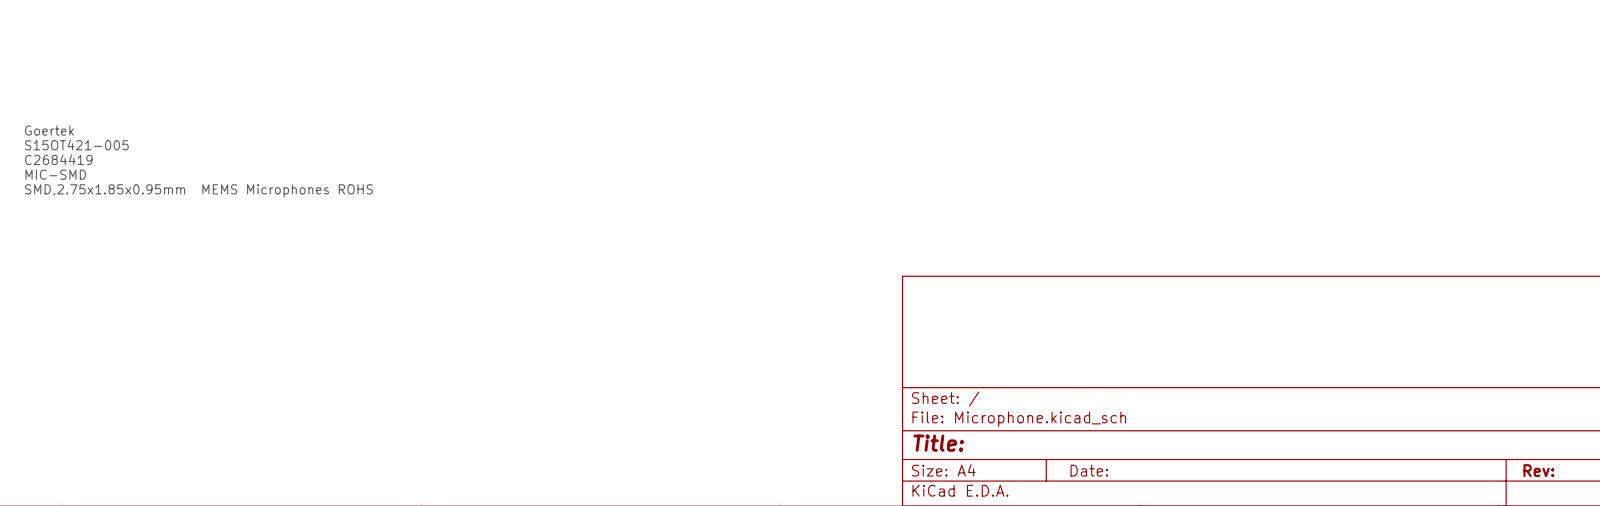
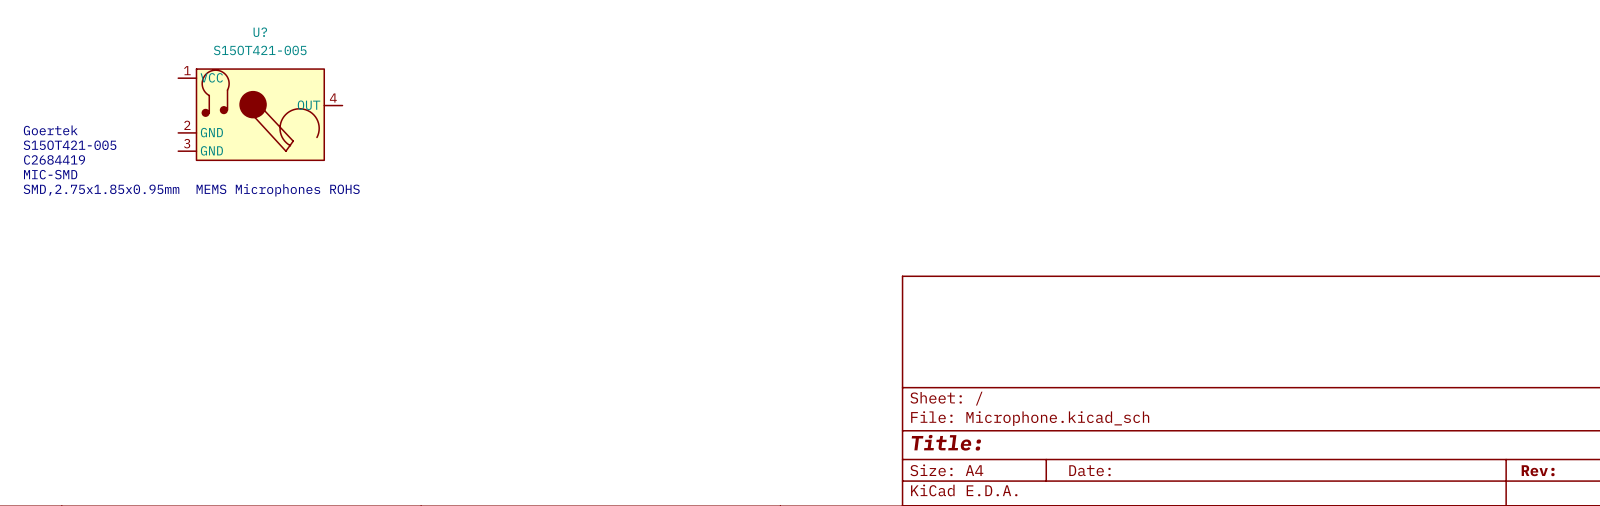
U?: none -> S15OT421-005 (260, 114)

